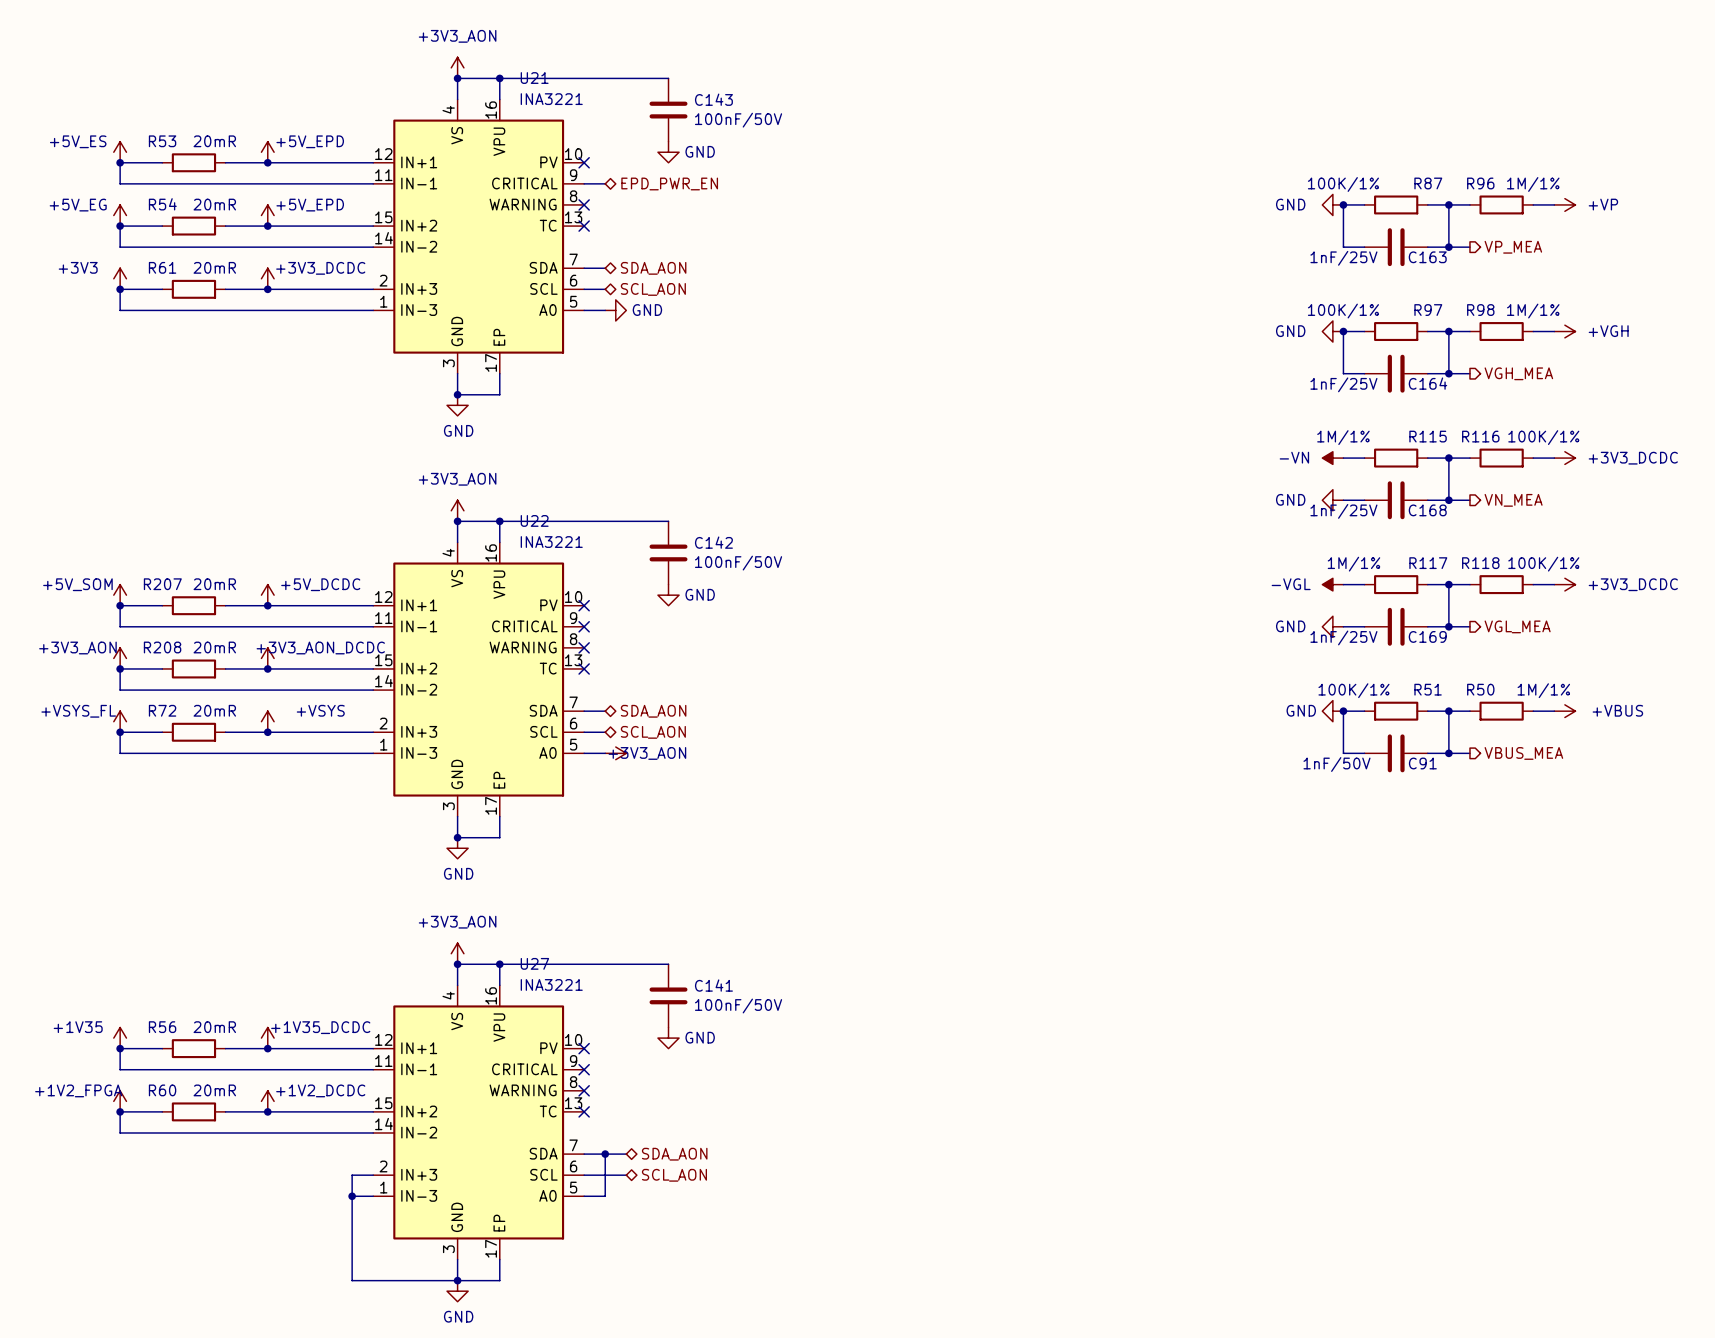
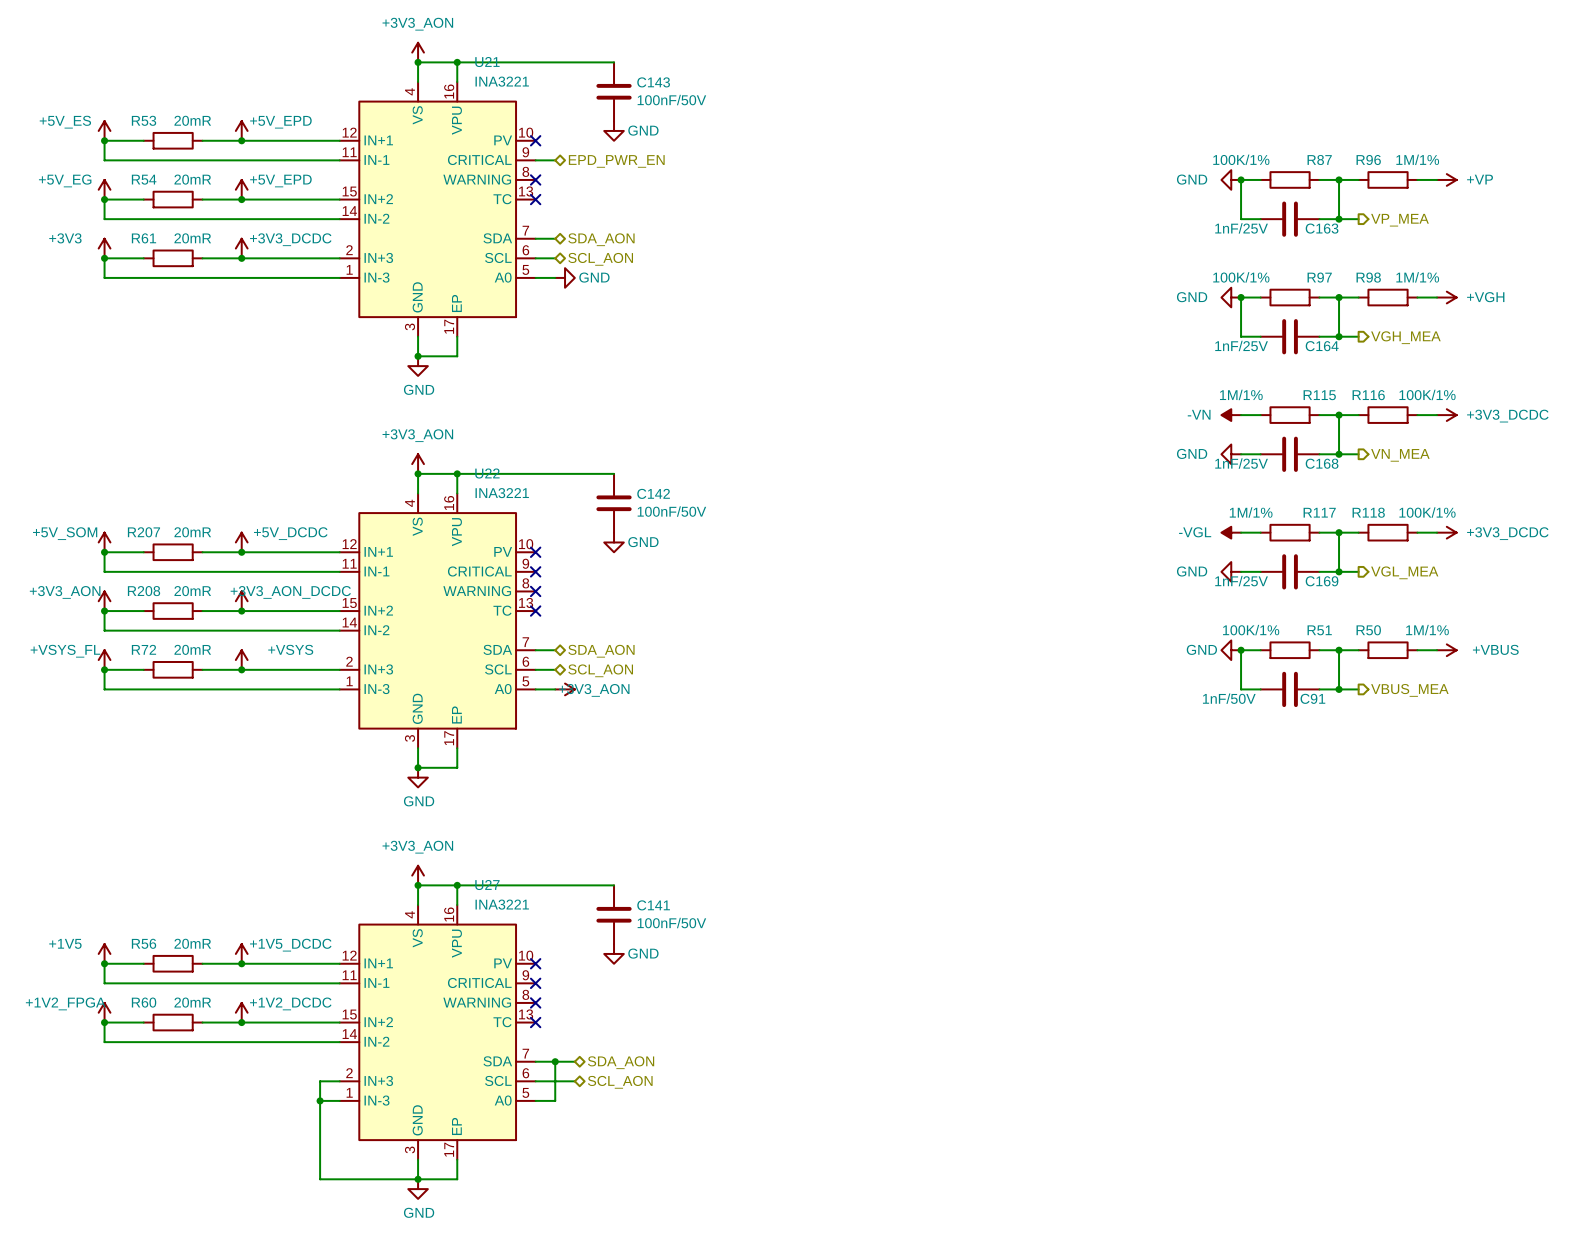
power symbol: +1V35 (120, 1038) -> +1V5 (104, 953)
power symbol: +1V35_DCDC (267, 1038) -> +1V5_DCDC (241, 953)

